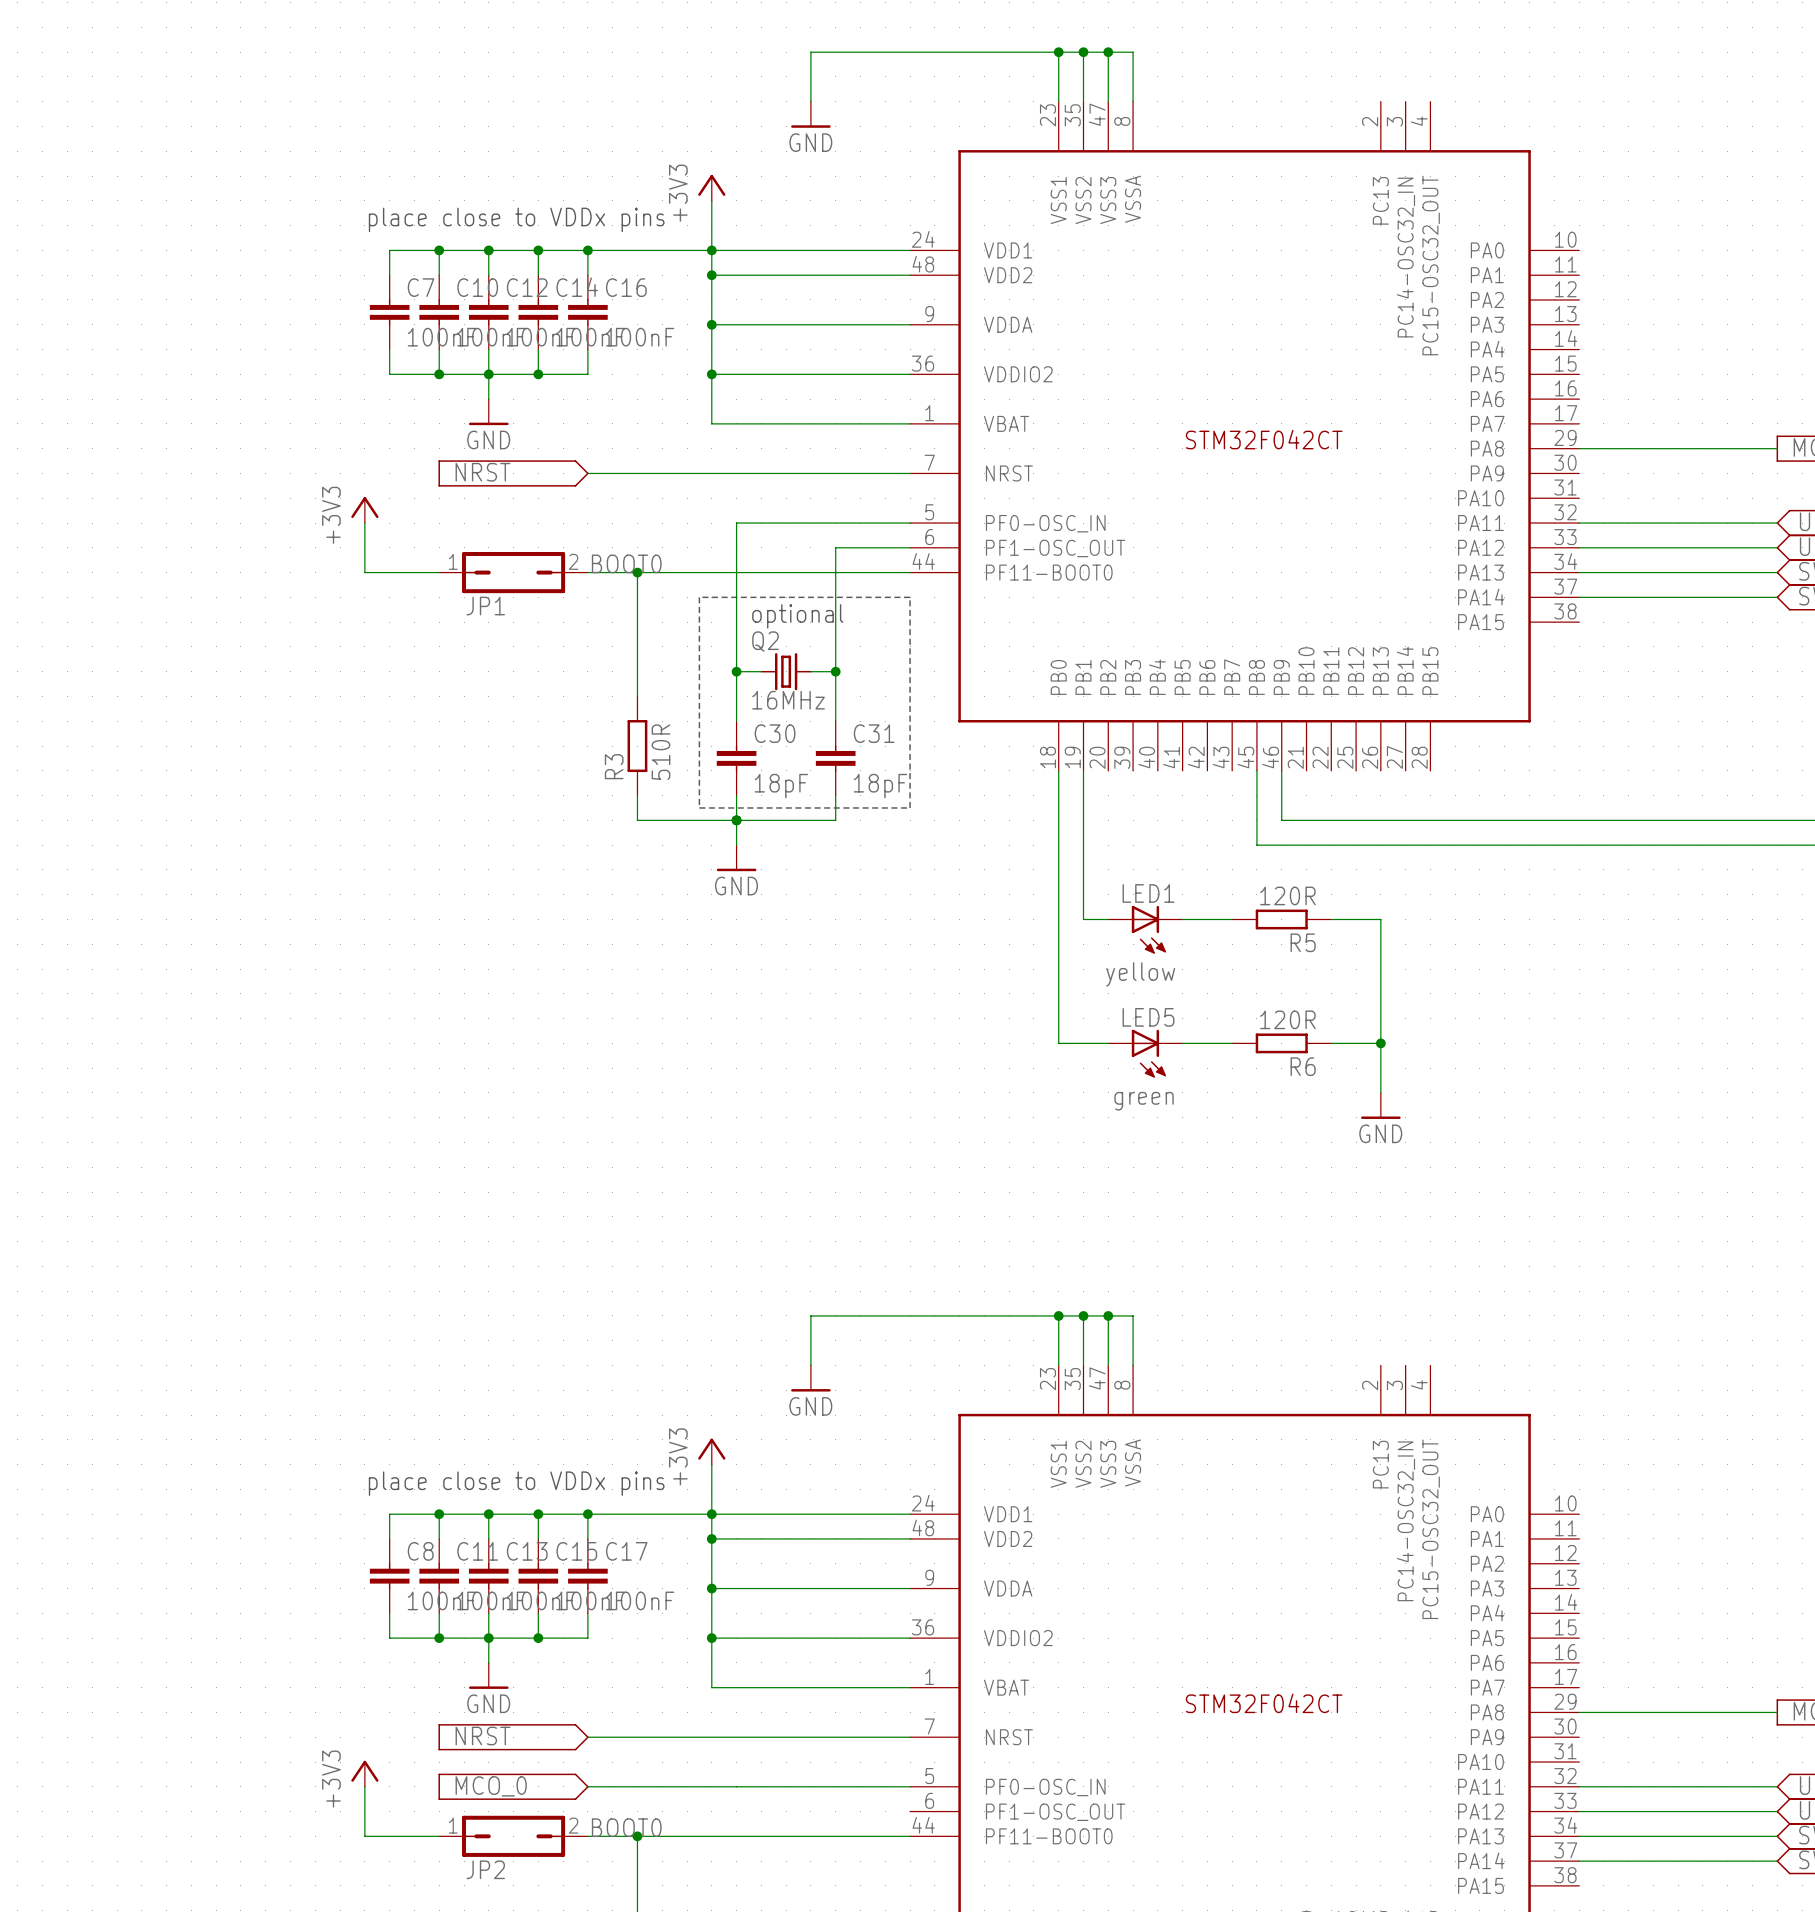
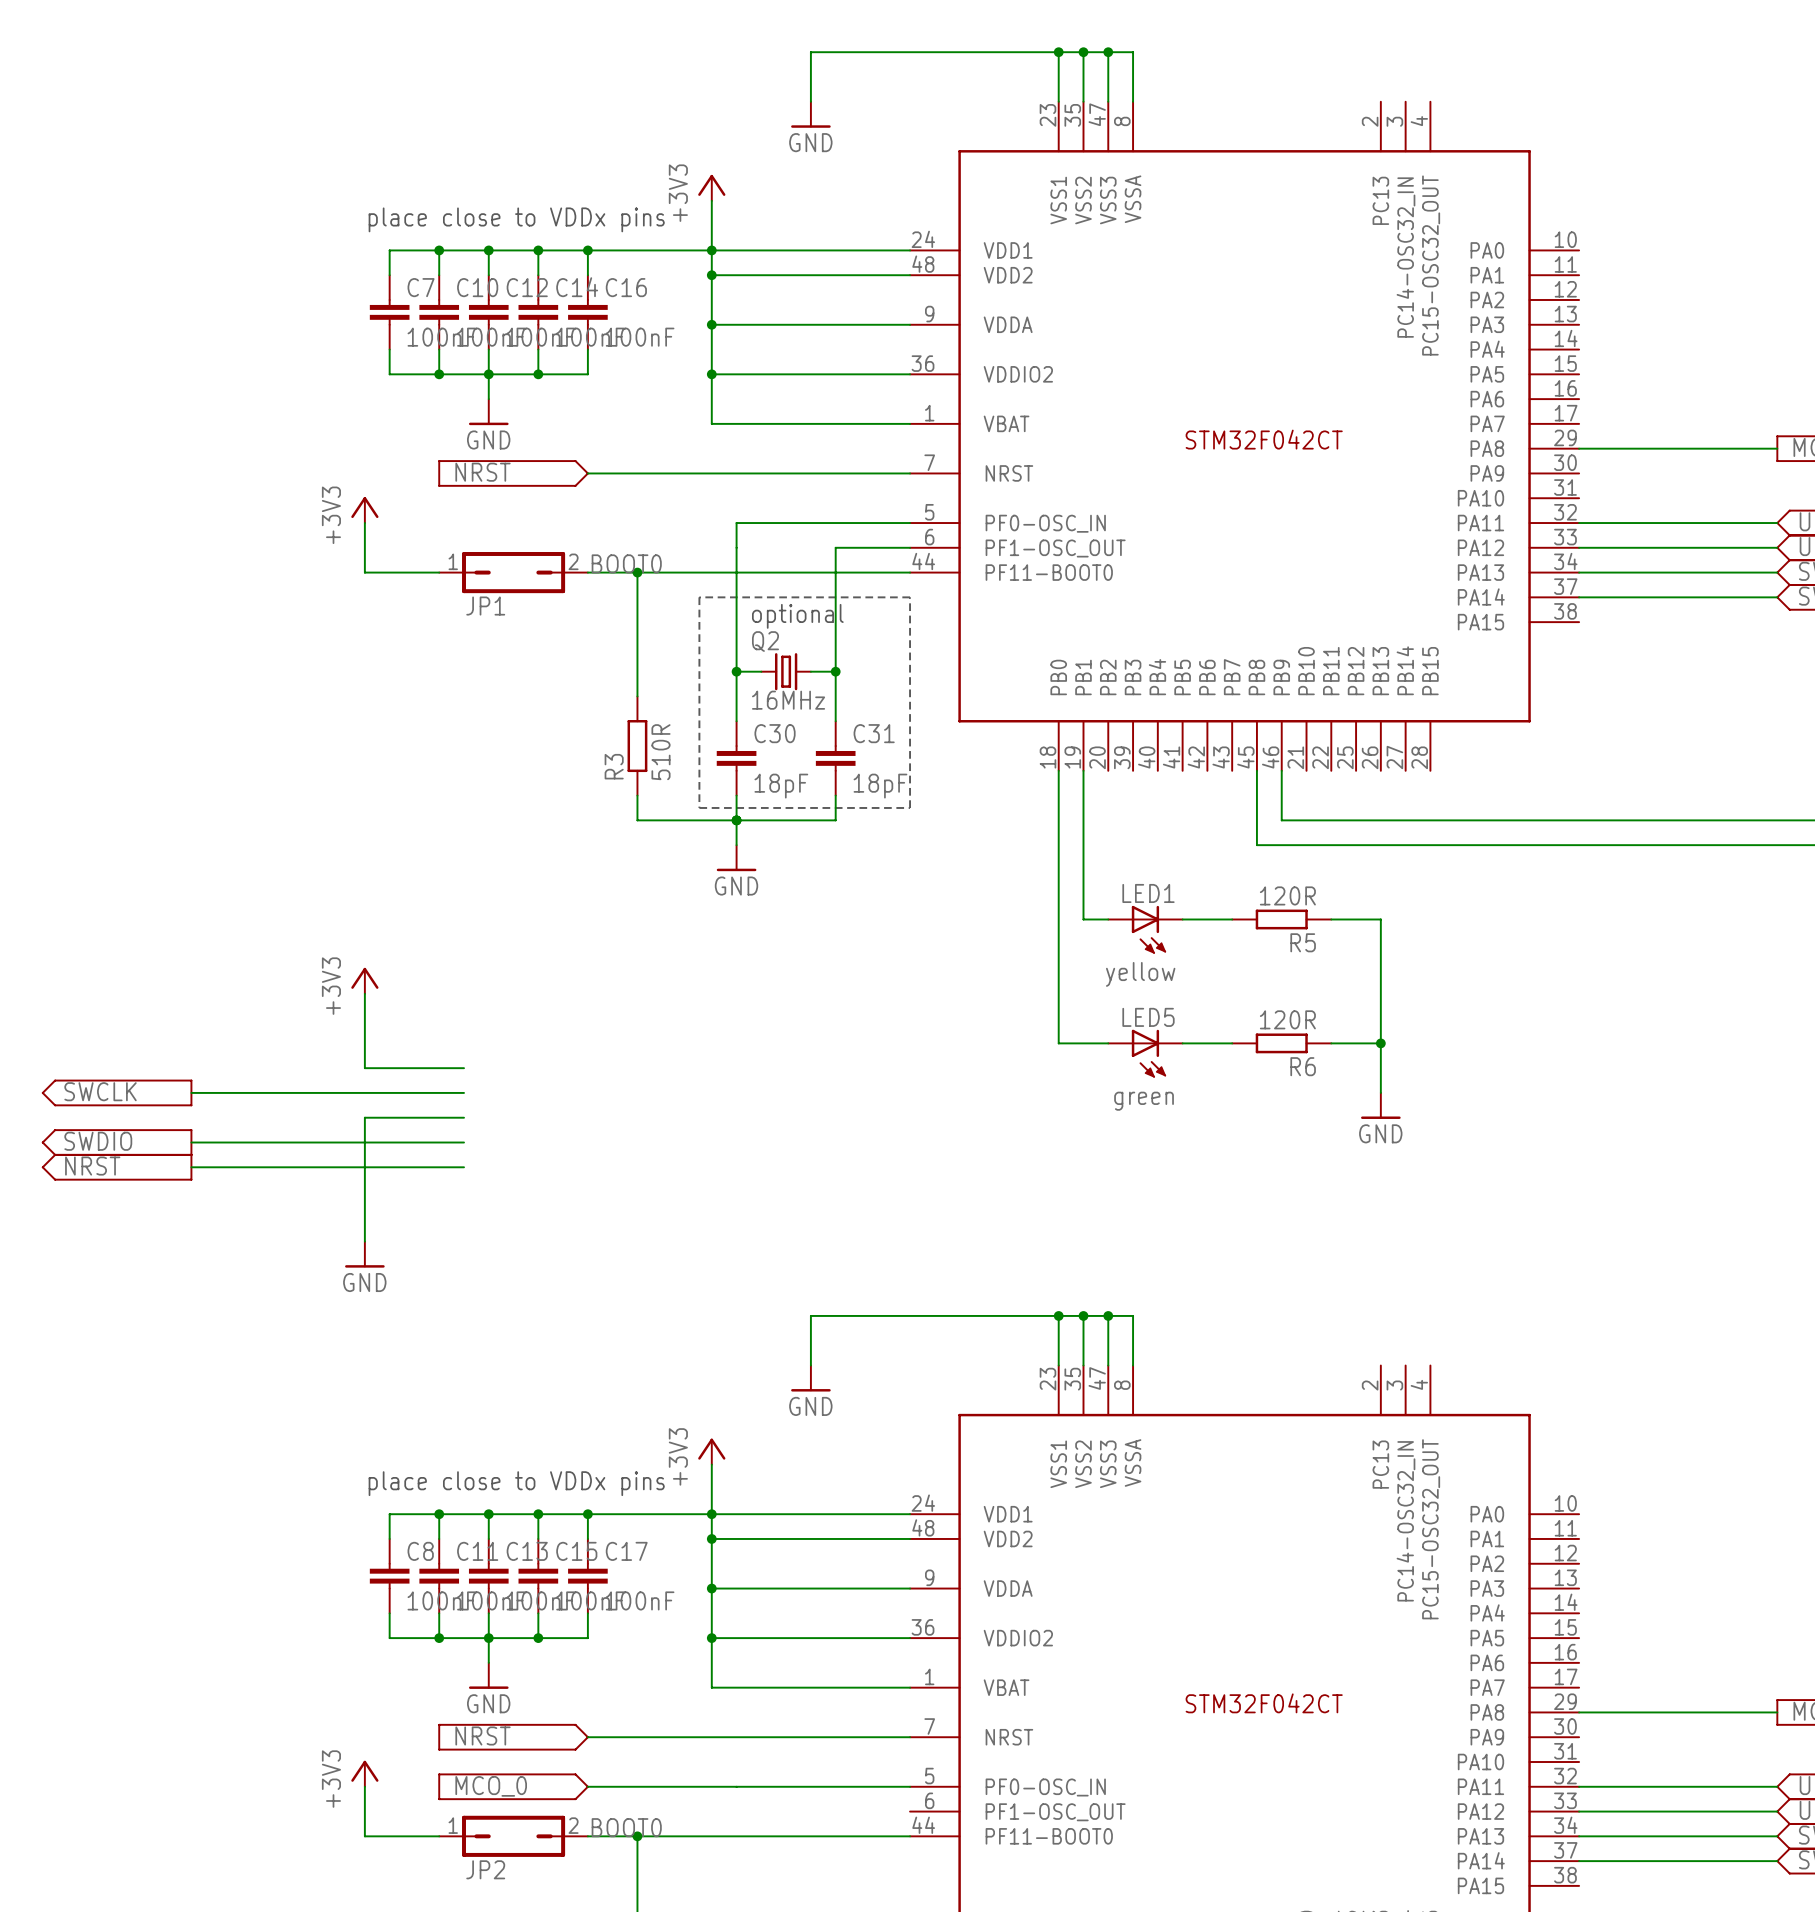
power symbol: none -> +3V3 (364, 980)
wire: none -> (364, 993) (364, 1068) (464, 1068)
part: none -> SWCLK (117, 1092)
wire: none -> (191, 1092) (464, 1092)
wire: none -> (464, 1117) (364, 1117) (364, 1241)
part: none -> SWDIO (117, 1142)
wire: none -> (191, 1142) (464, 1142)
part: none -> NRST (117, 1167)
wire: none -> (191, 1167) (464, 1167)
power symbol: none -> GND (364, 1254)

